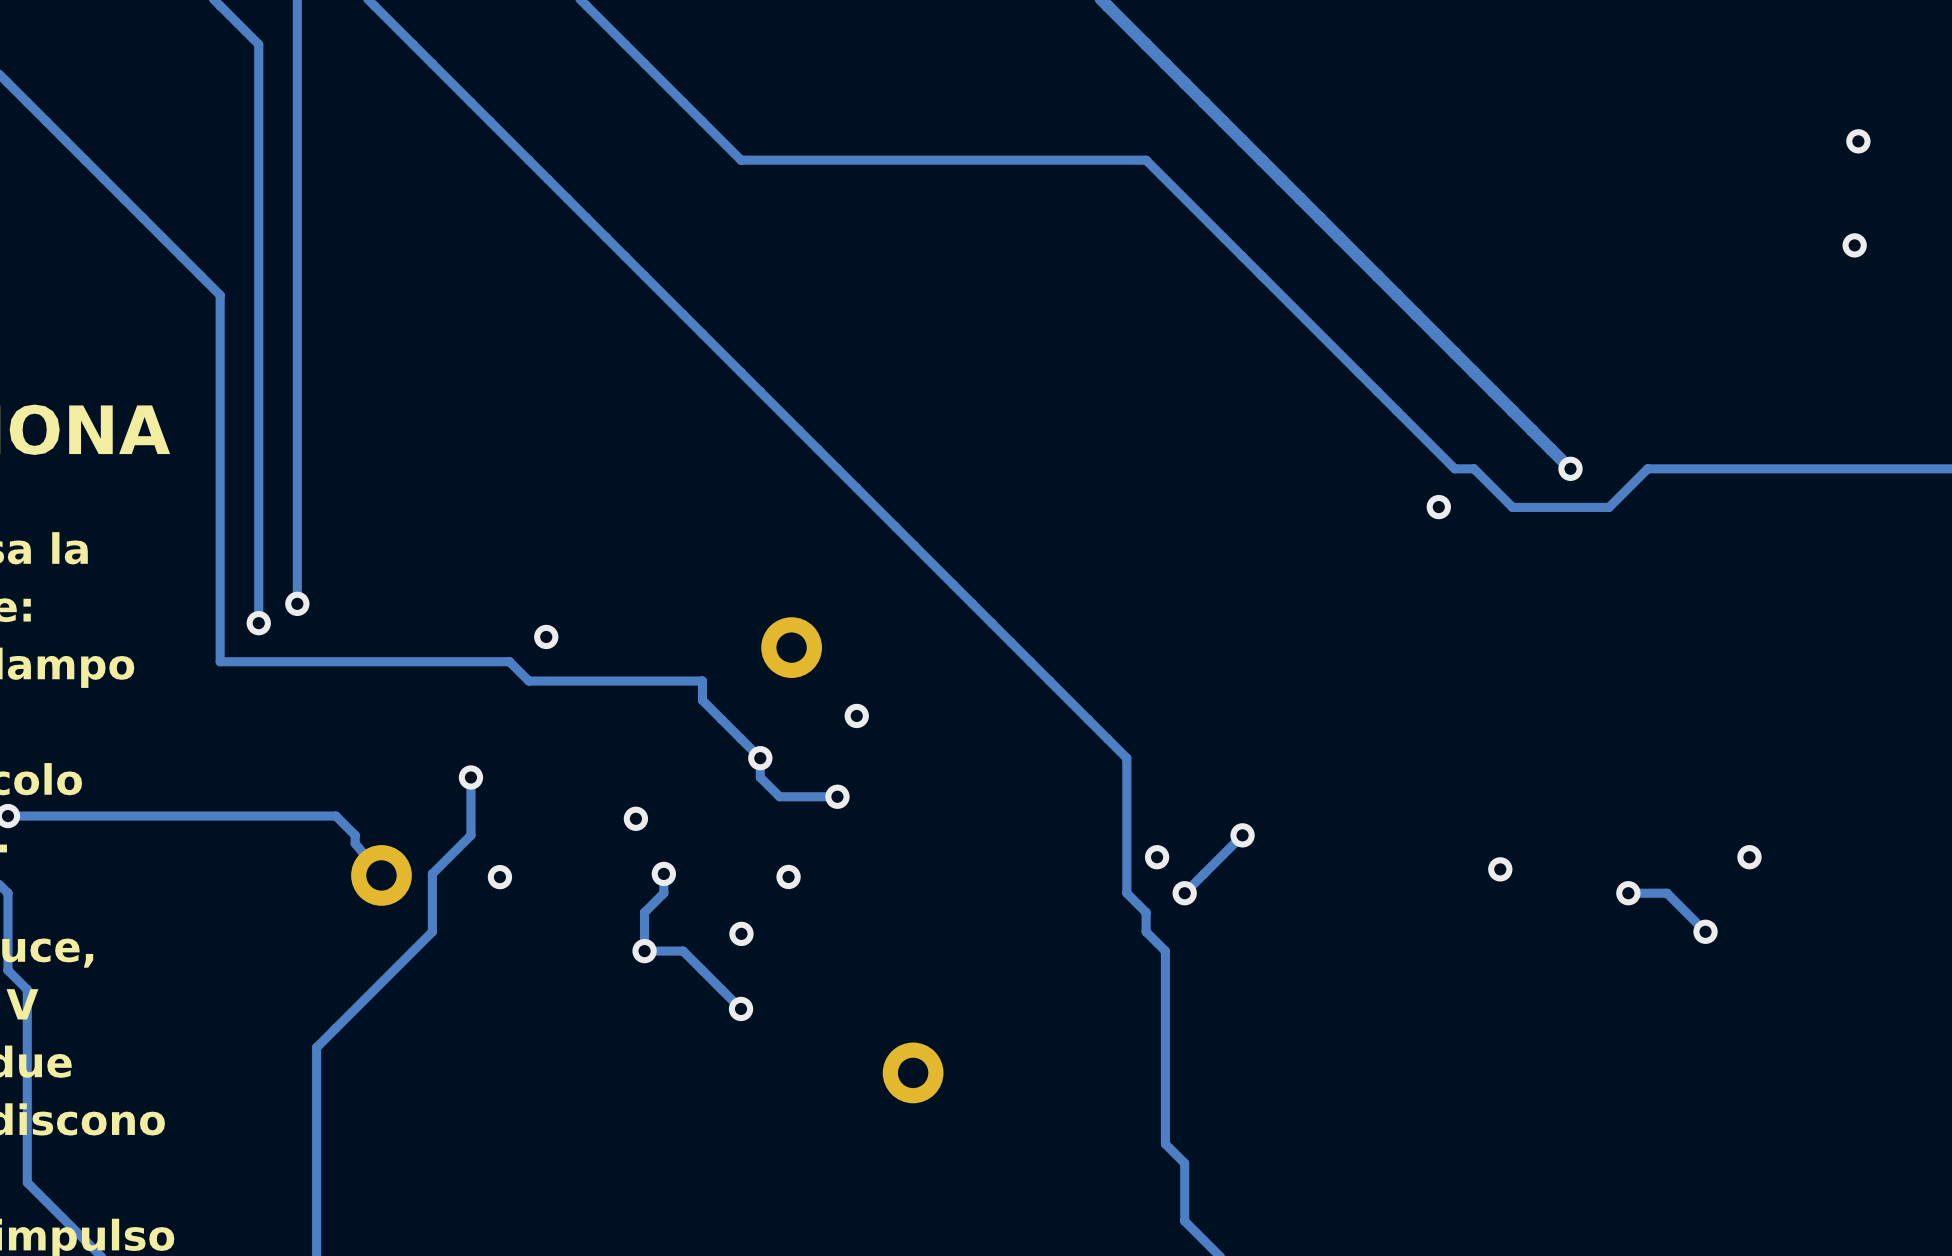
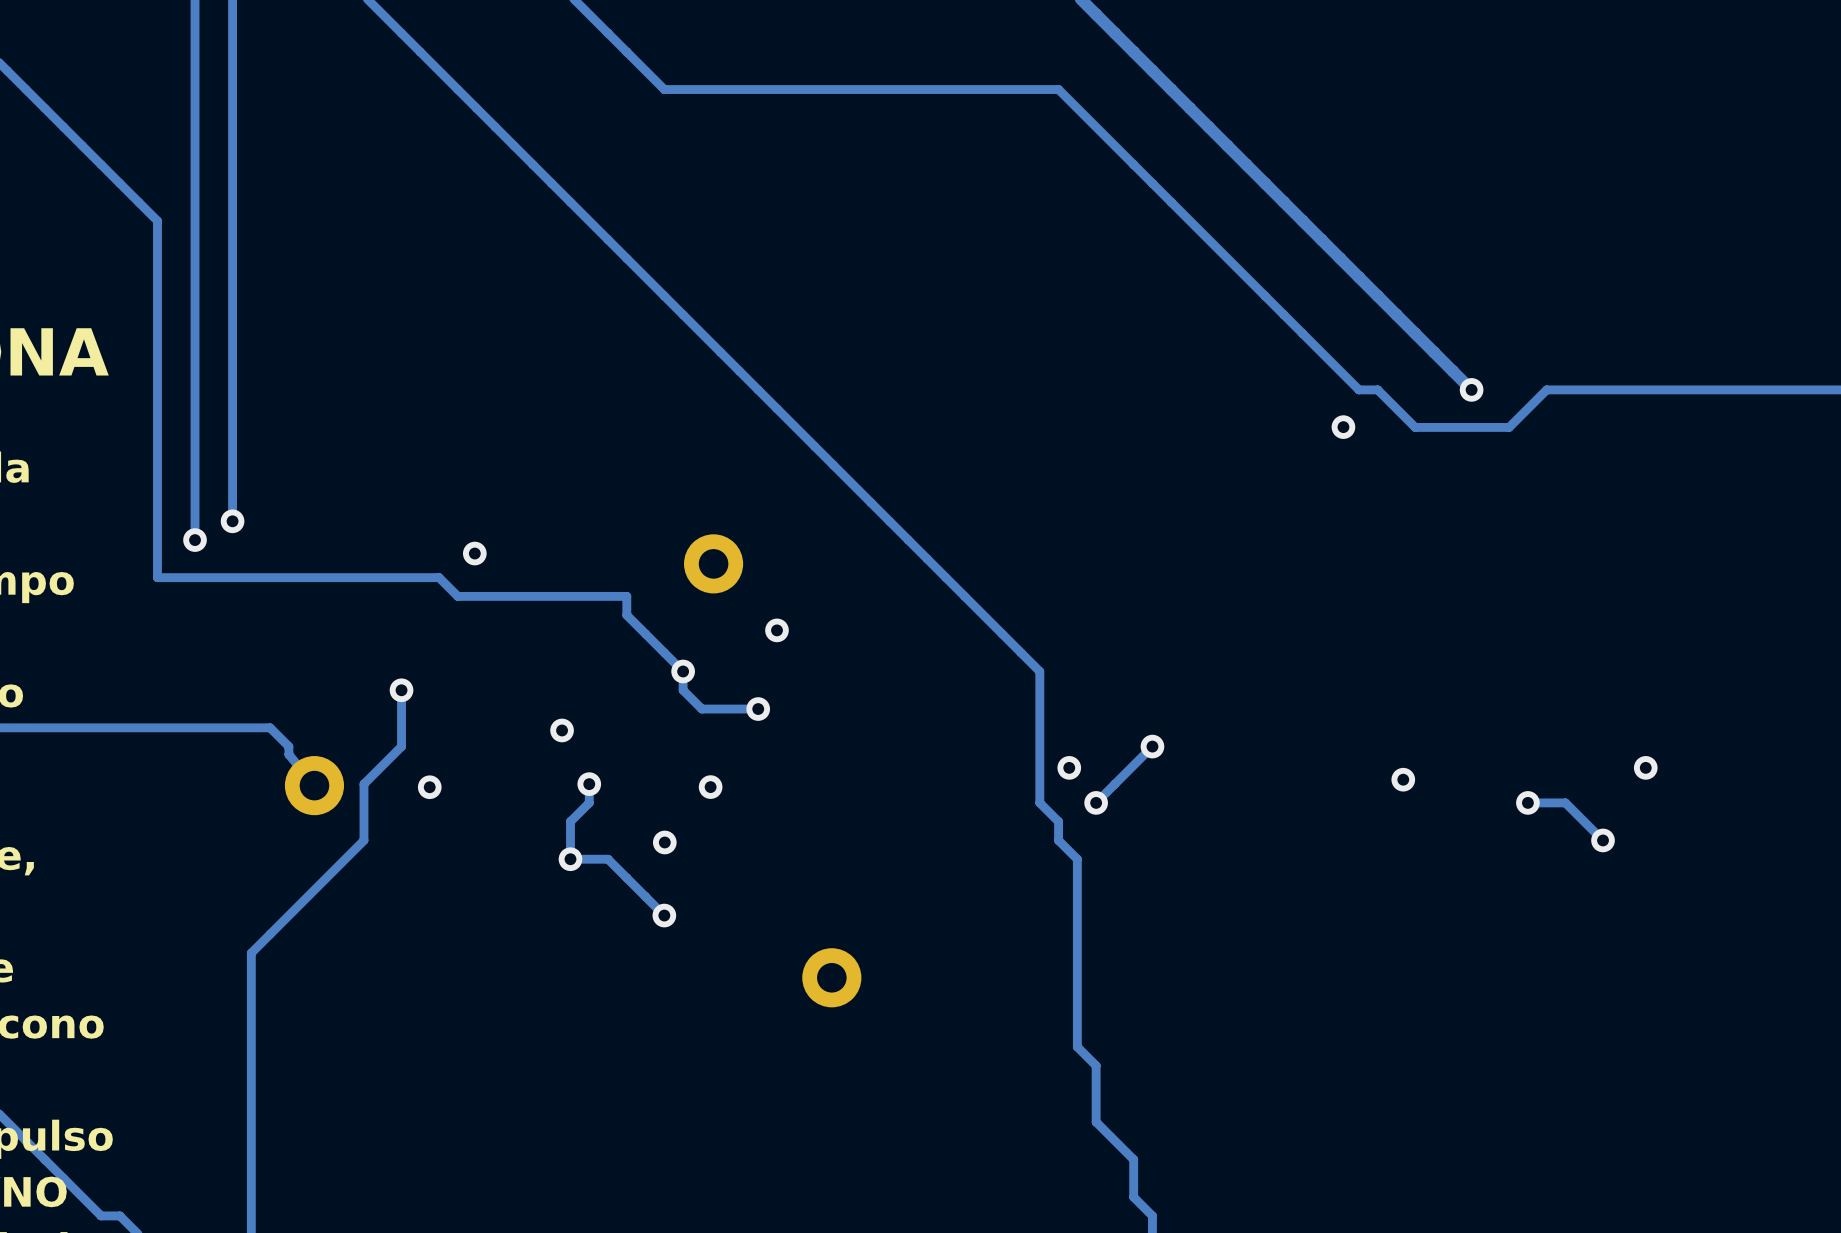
via: (1858, 141) -> none
via: (1854, 245) -> none

